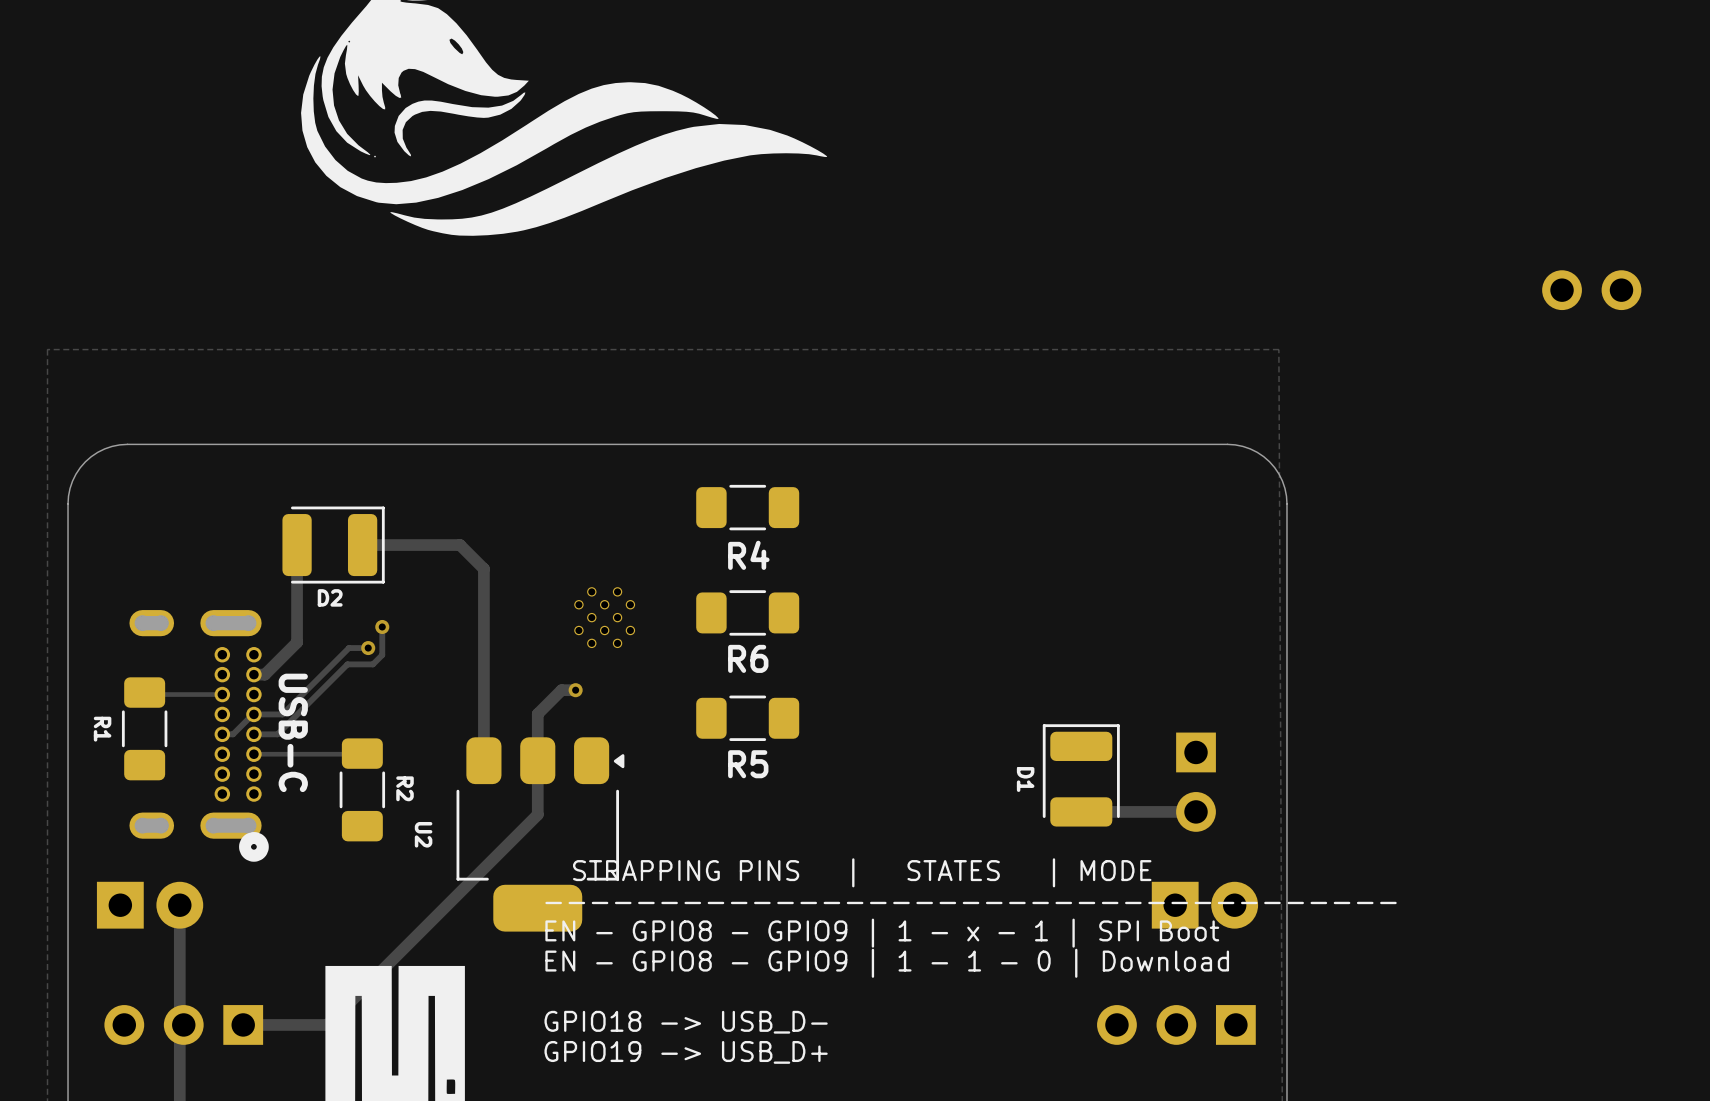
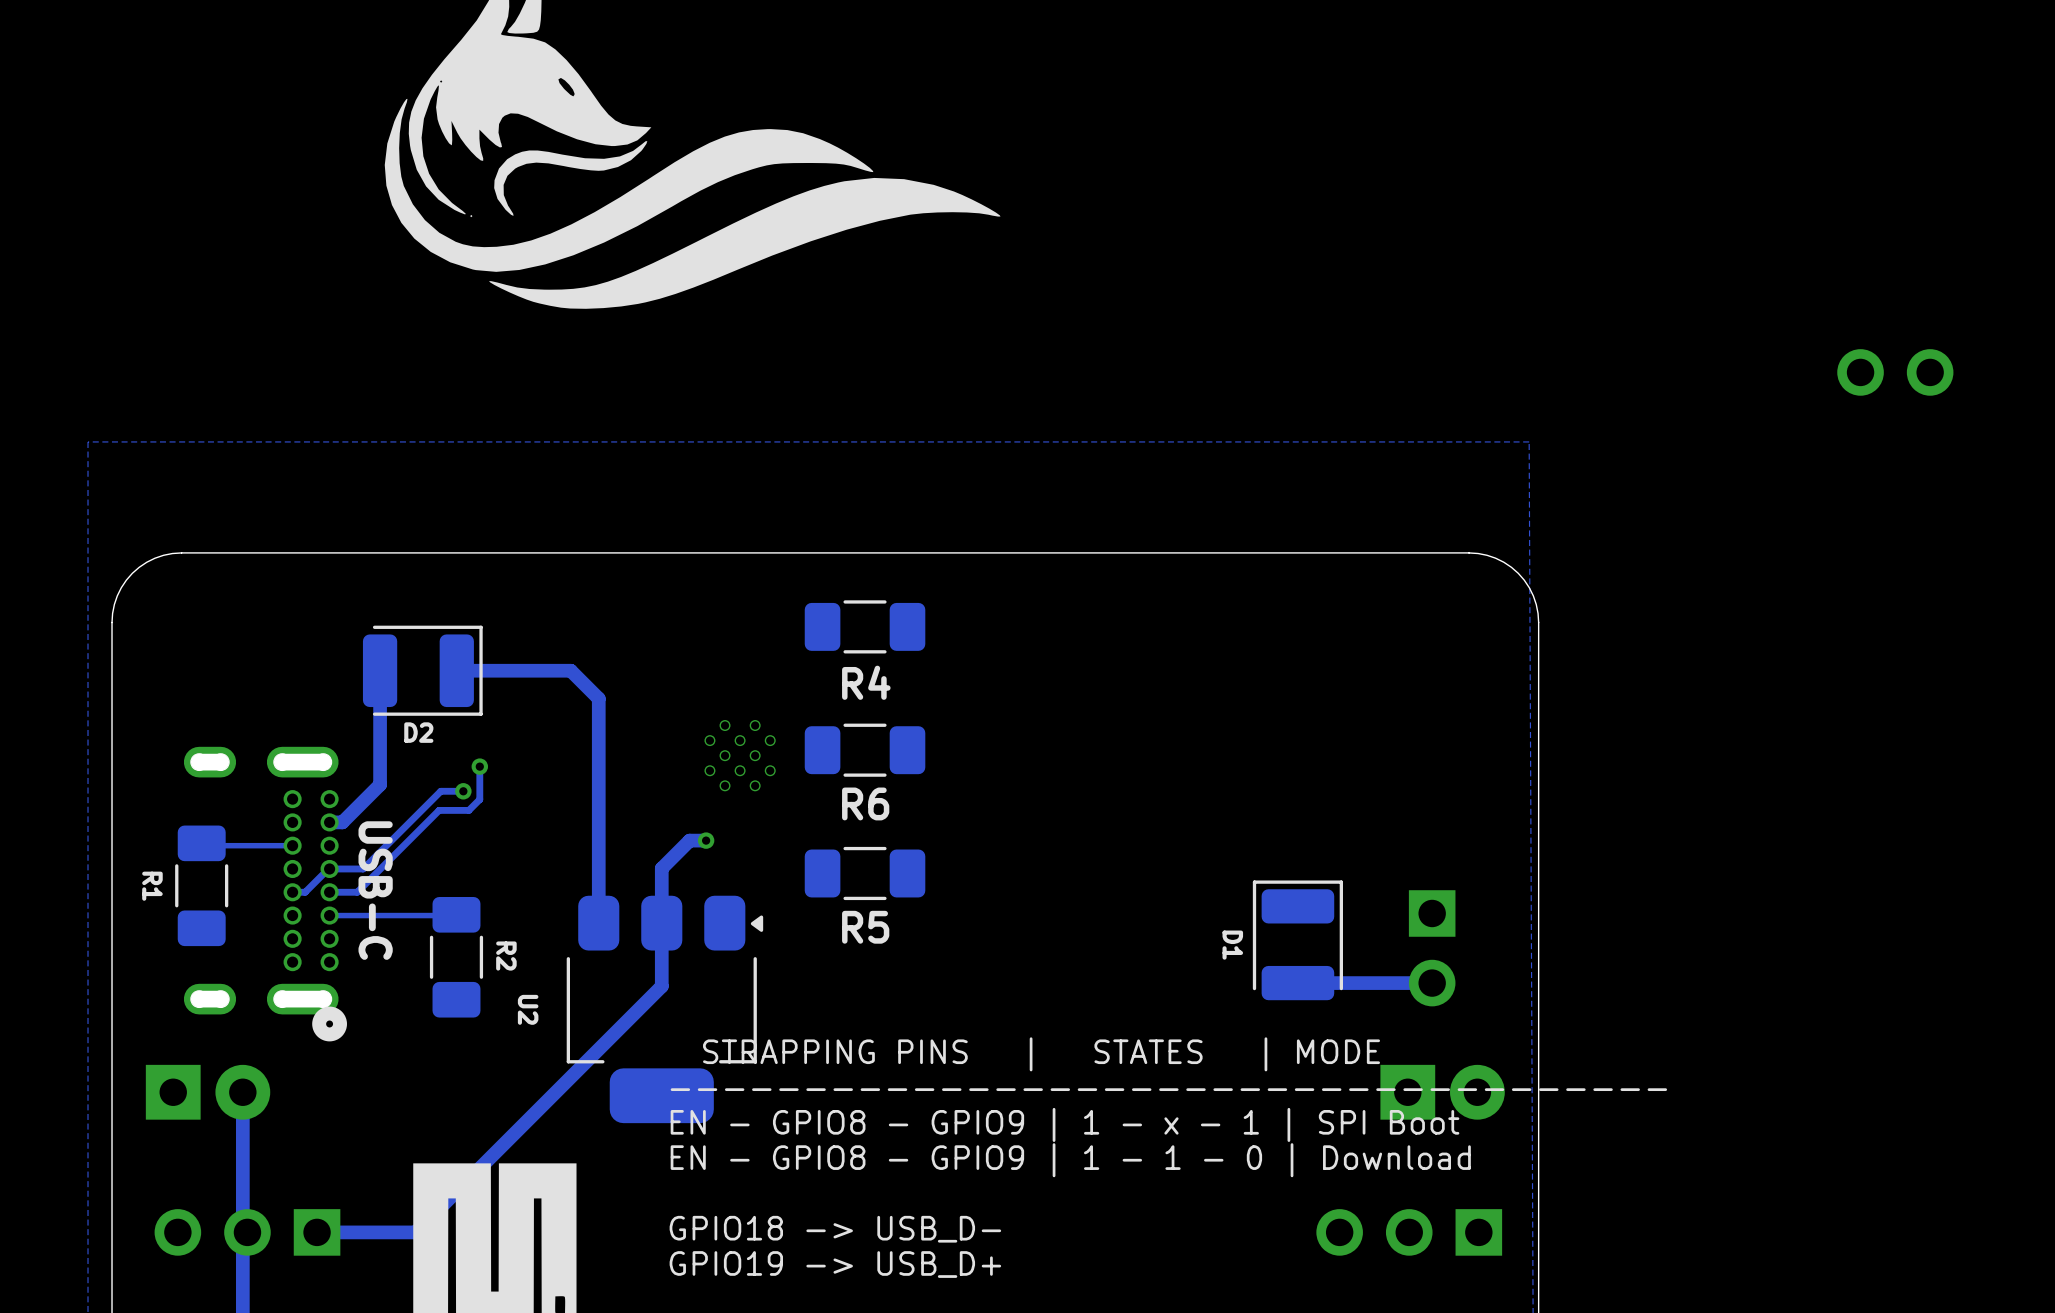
R4 position: (747, 507) -> (865, 626)
R6 position: (747, 612) -> (865, 750)
R5 position: (747, 718) -> (865, 873)

